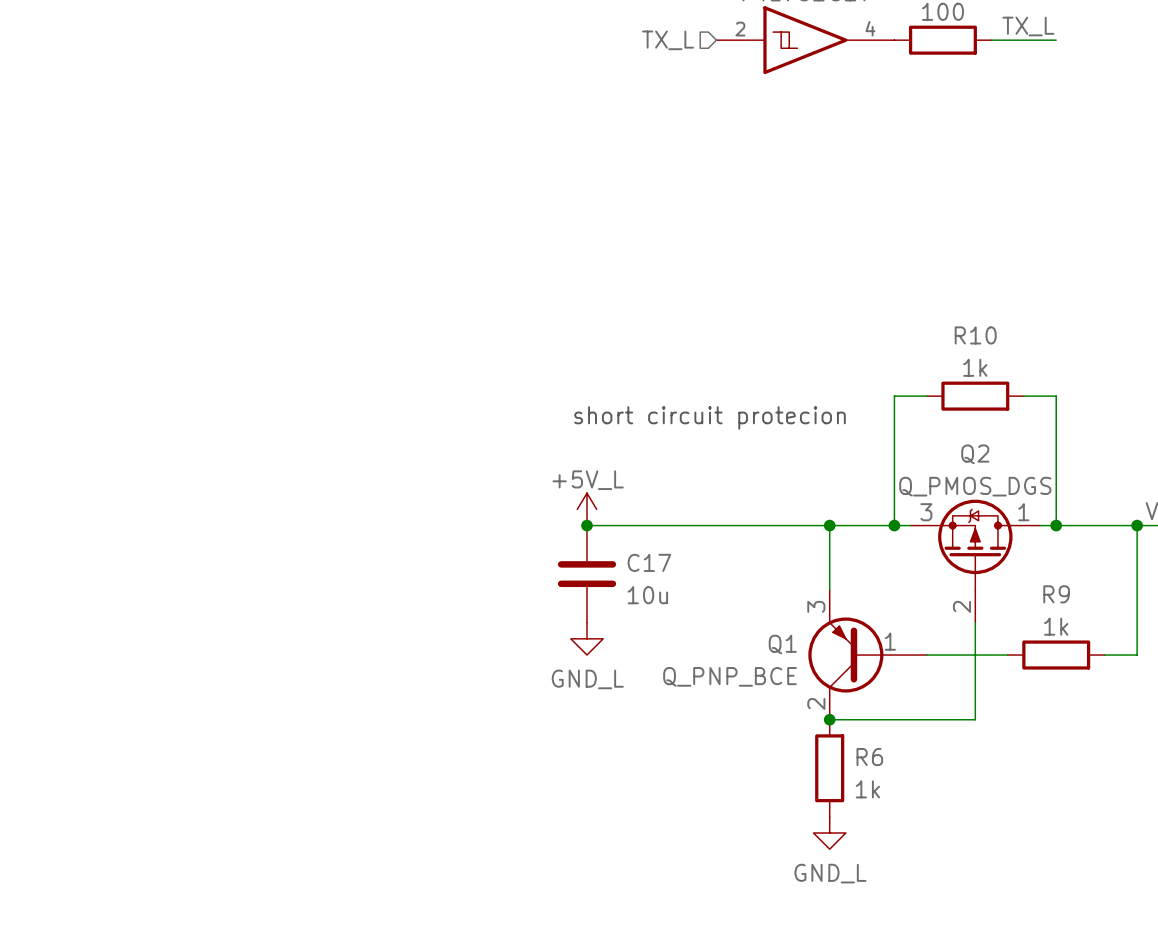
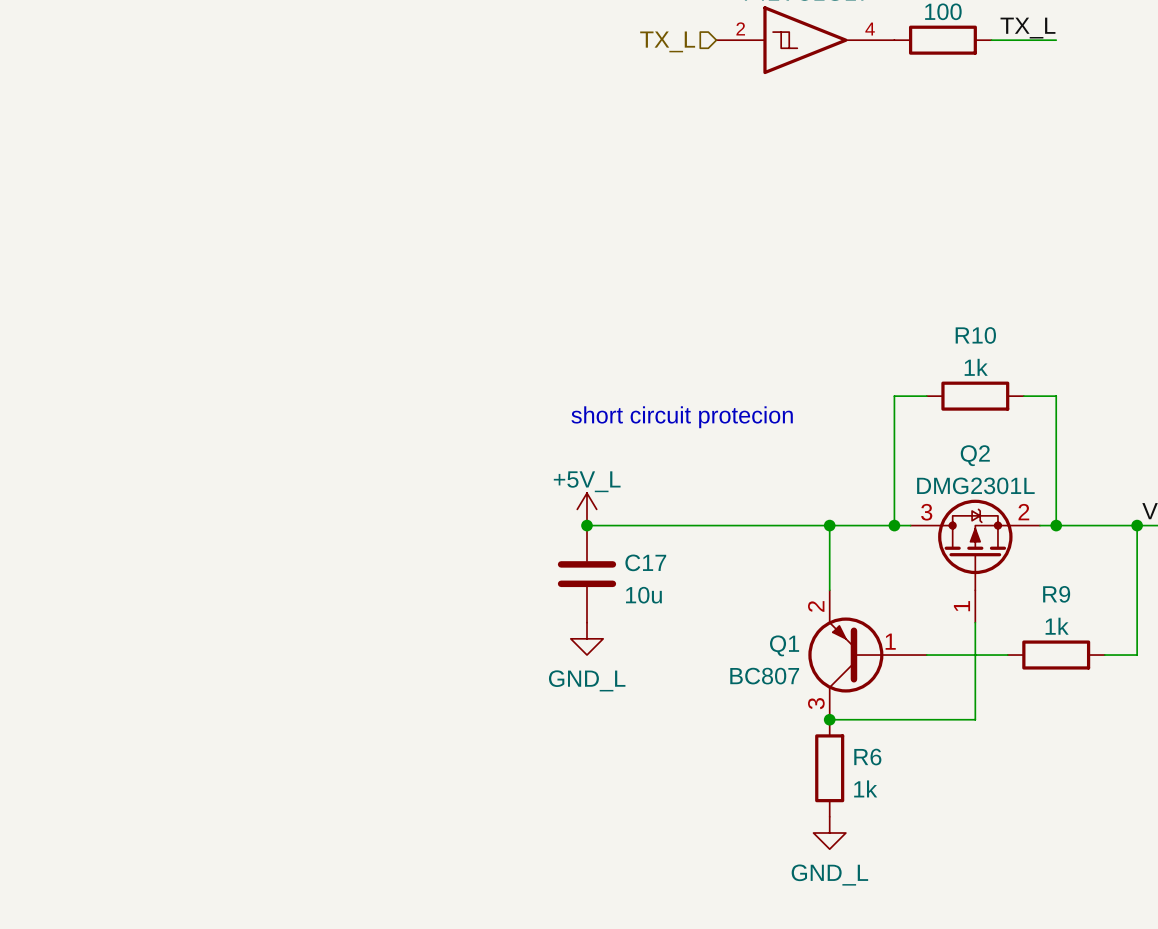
Q2 value: Q_PMOS_DGS (975, 486) -> DMG2301L (975, 485)
Q2 symbol: [910, 499, 1041, 623] -> [910, 499, 1041, 623]
Q1 pin number: 3 (816, 606) -> 2 (816, 606)
Q1 value: Q_PNP_BCE (730, 676) -> BC807 (764, 676)
Q1 pin number: 2 (816, 703) -> 3 (816, 703)

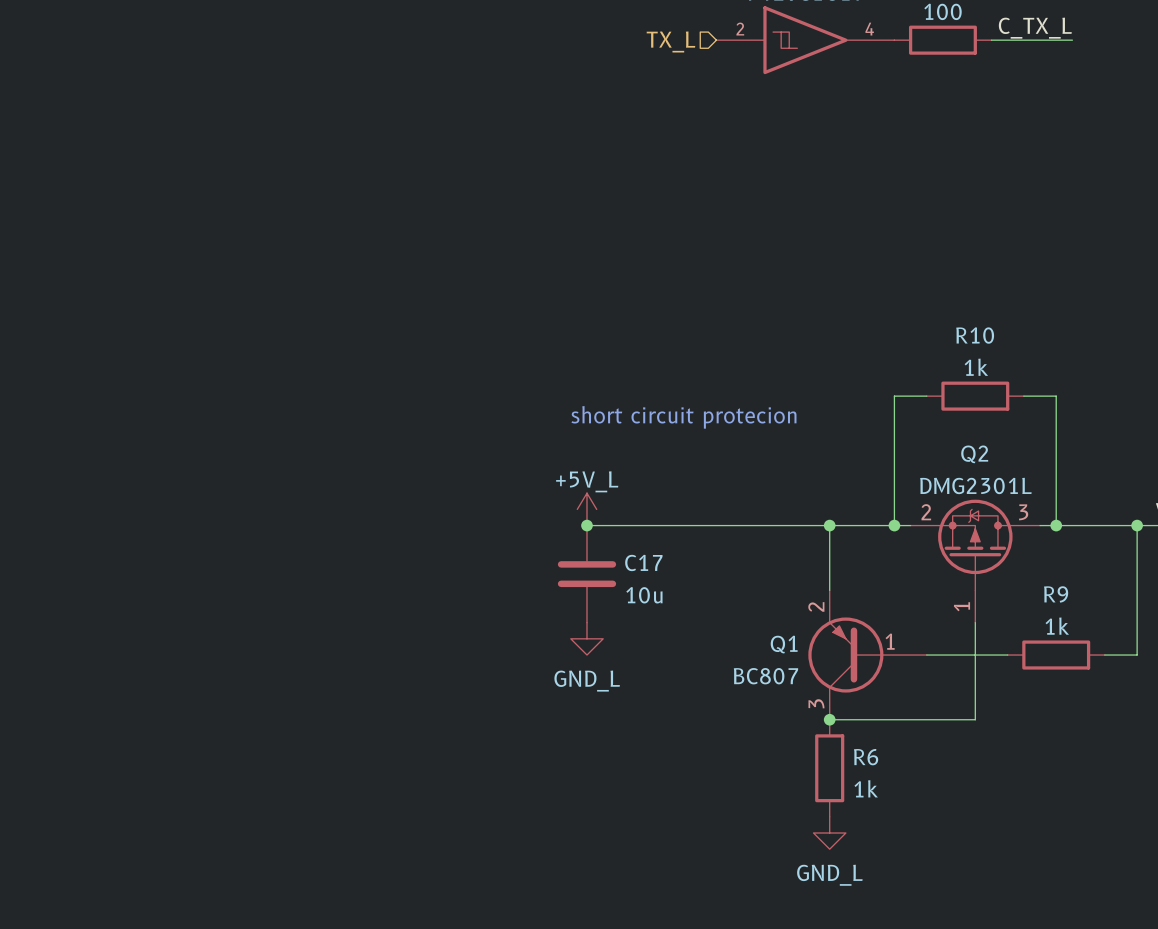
label: TX_L (1027, 28) -> C_TX_L (1035, 28)
wire: none -> (1056, 40) (1072, 40)
Q2 flip: as is (975, 544) -> left-right (975, 544)

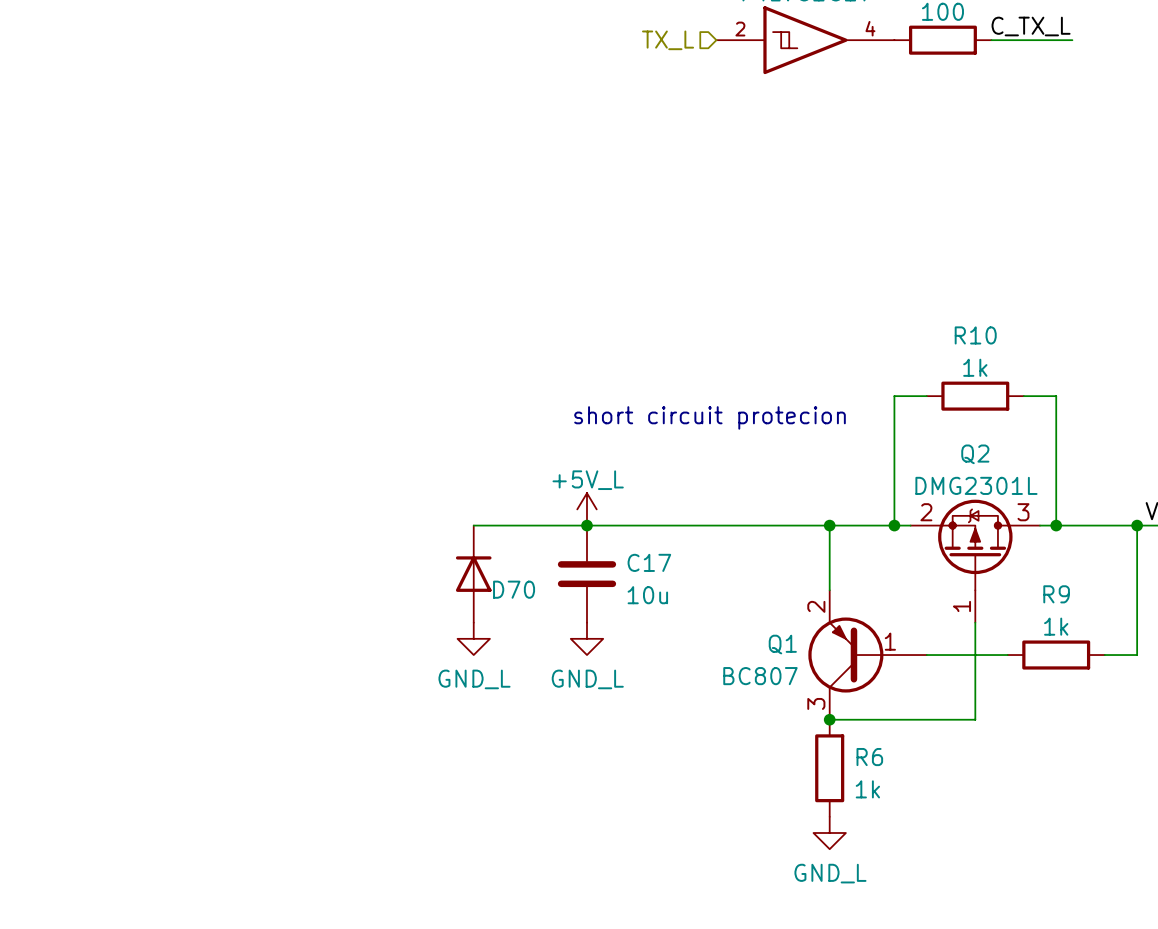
wire: none -> (473, 525) (586, 525)
D70: none -> (473, 574)
power symbol: none -> GND_L (473, 638)

